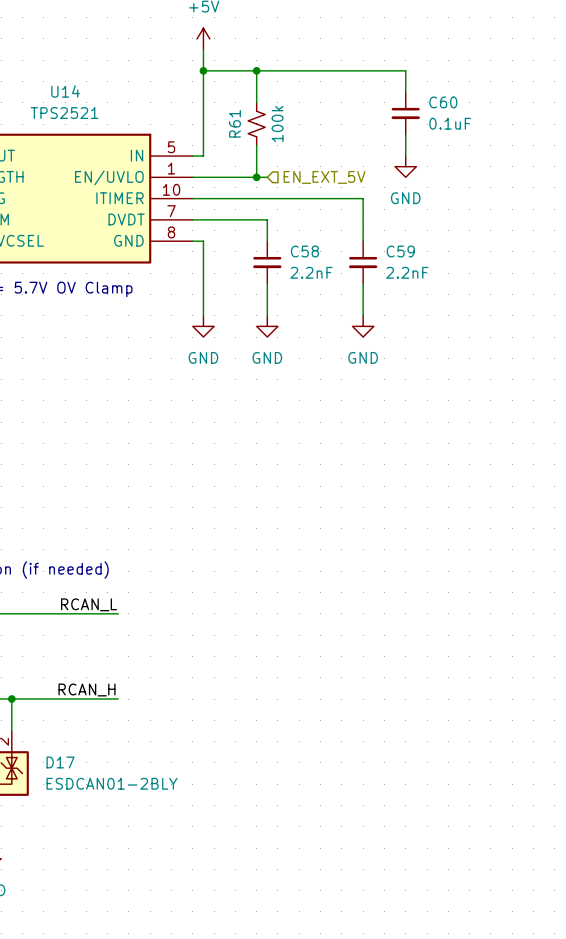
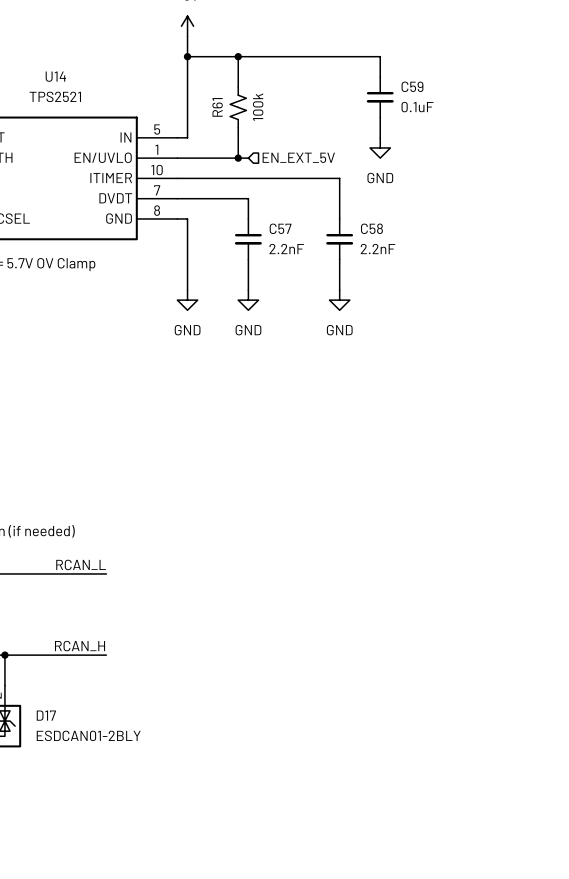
C60 name: C60 (443, 102) -> C59 (412, 86)
C58 name: C58 (304, 251) -> C57 (280, 228)
C59 name: C59 (400, 251) -> C58 (371, 228)

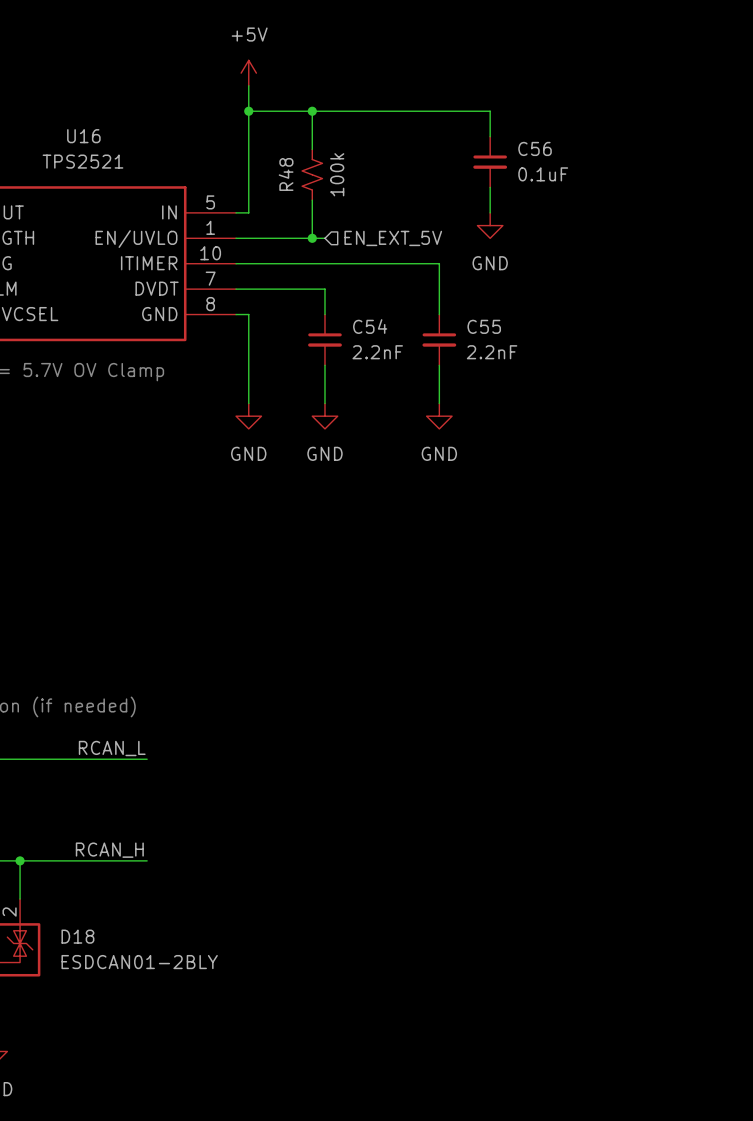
U14 name: U14 (55, 76) -> U16 (83, 136)
C59 name: C59 (412, 86) -> C56 (535, 148)
R61 name: R61 (217, 107) -> R48 (286, 174)
C57 name: C57 (280, 228) -> C54 (370, 326)
C58 name: C58 (371, 228) -> C55 (484, 326)
D17 name: D17 (46, 715) -> D18 (77, 936)

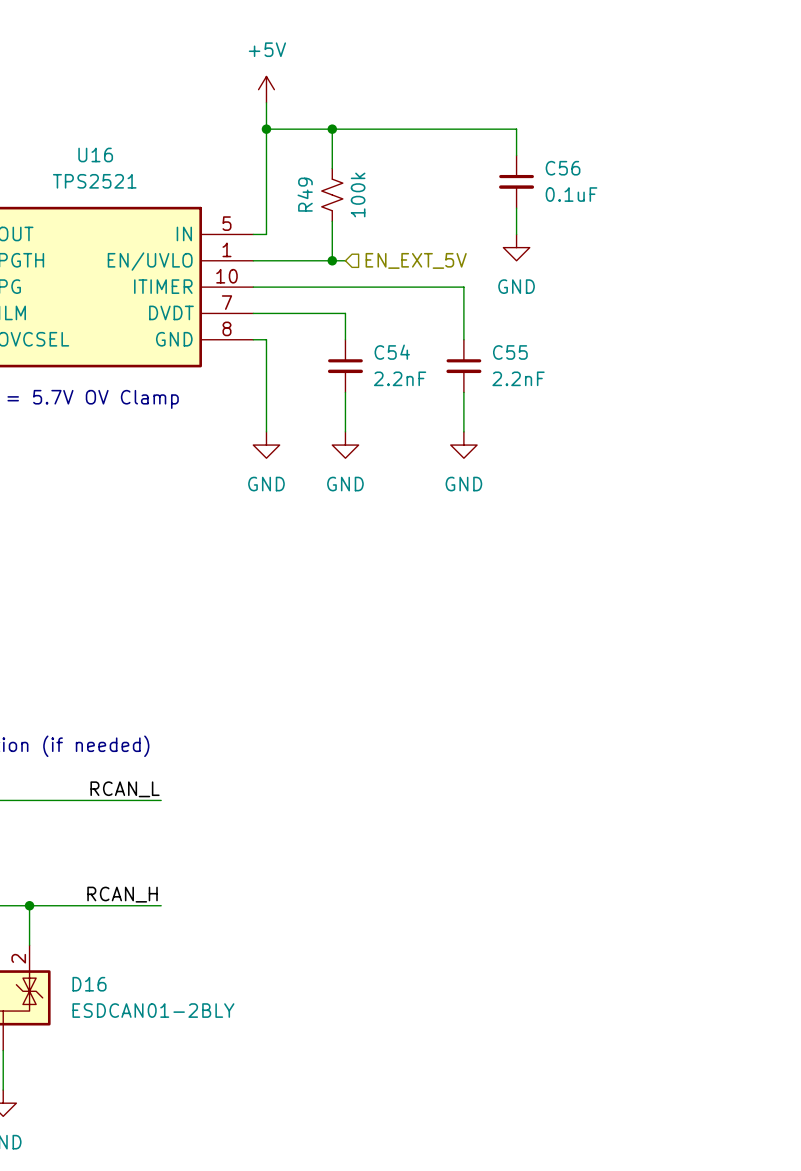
R48 name: R48 (286, 174) -> R49 (305, 194)
D18 name: D18 (77, 936) -> D16 (89, 984)

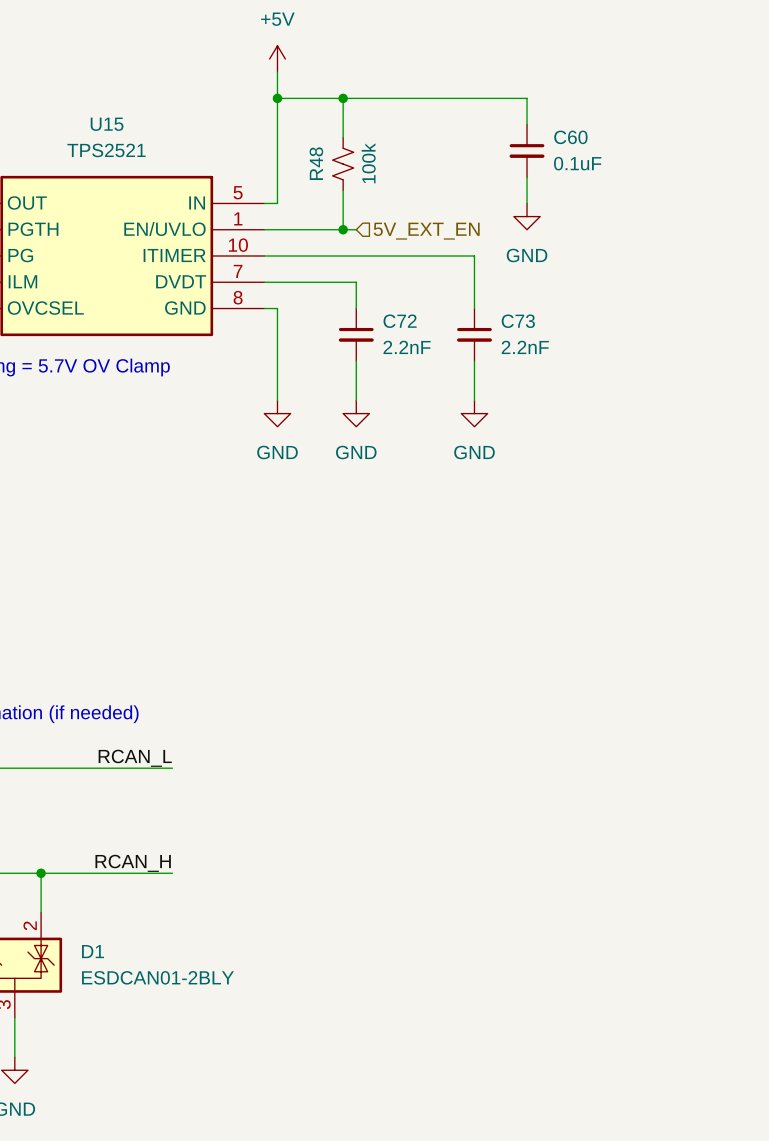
U16 name: U16 (95, 154) -> U15 (107, 124)
C56 name: C56 (563, 168) -> C60 (570, 137)
R49 name: R49 (305, 194) -> R48 (316, 163)
hierarchical label: EN_EXT_5V (416, 260) -> 5V_EXT_EN (426, 231)
C54 name: C54 (392, 352) -> C72 (400, 321)
C55 name: C55 (510, 352) -> C73 (518, 321)
D16 name: D16 (89, 984) -> D1 (93, 951)

